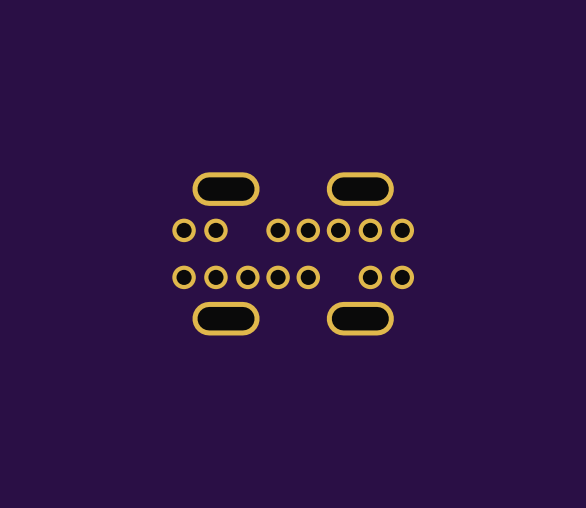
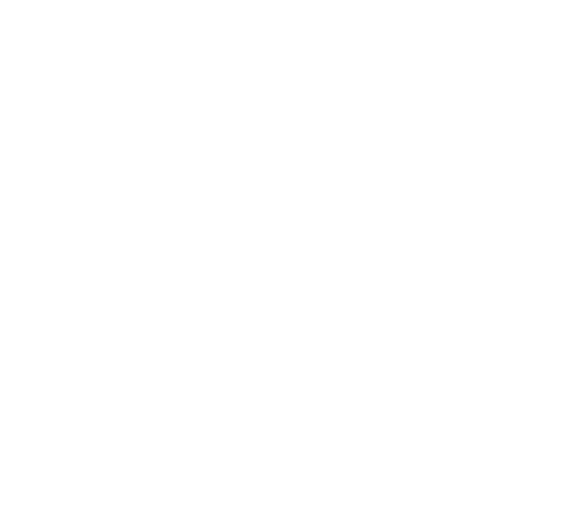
part: (293, 253) -> none

